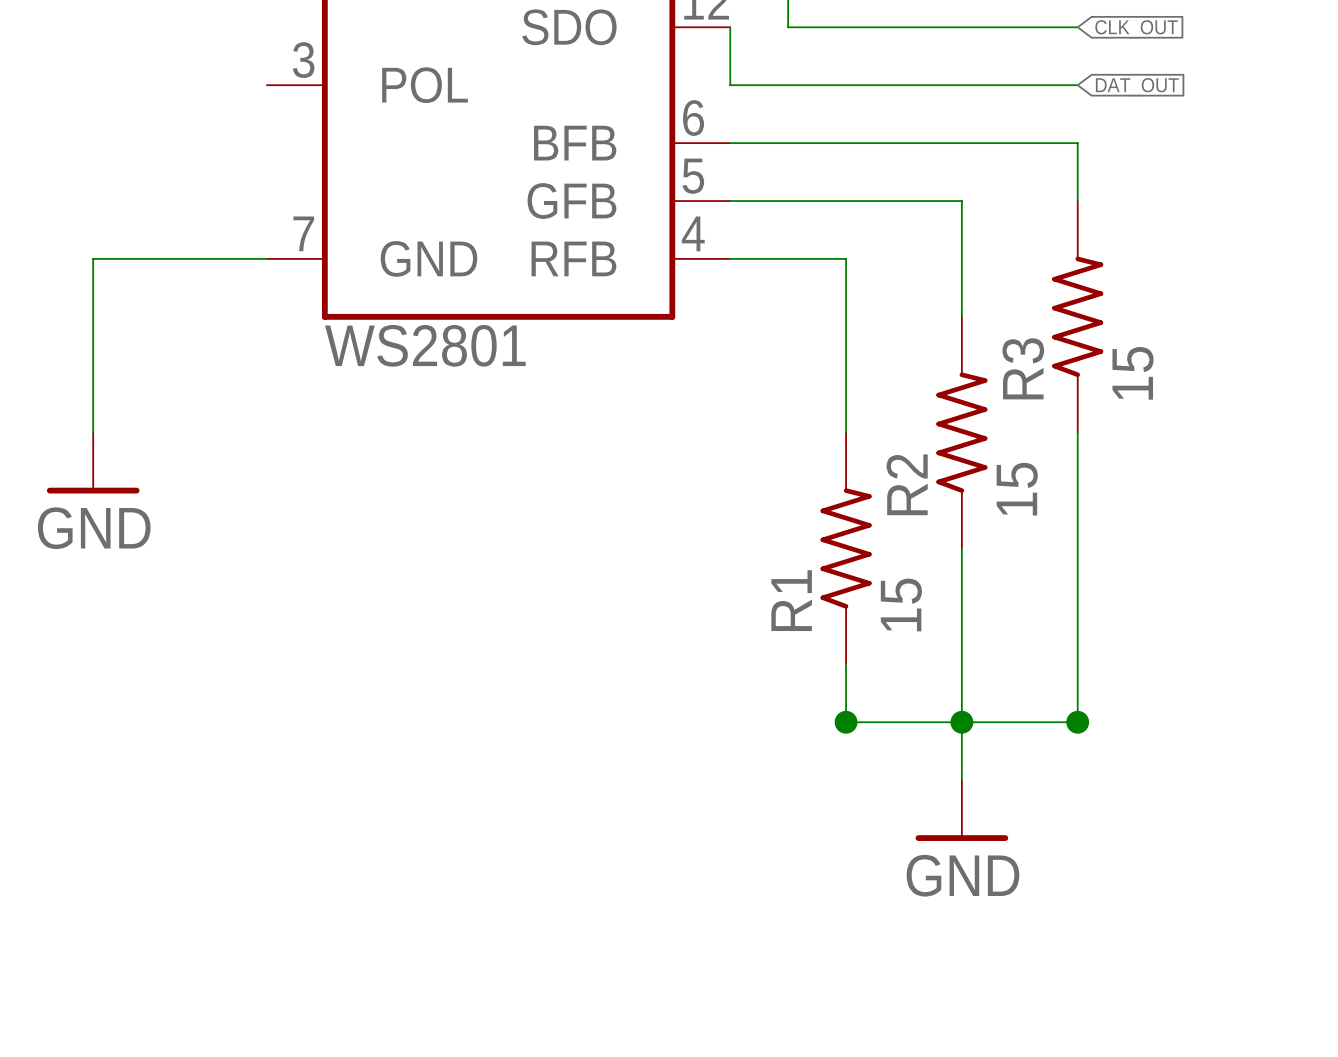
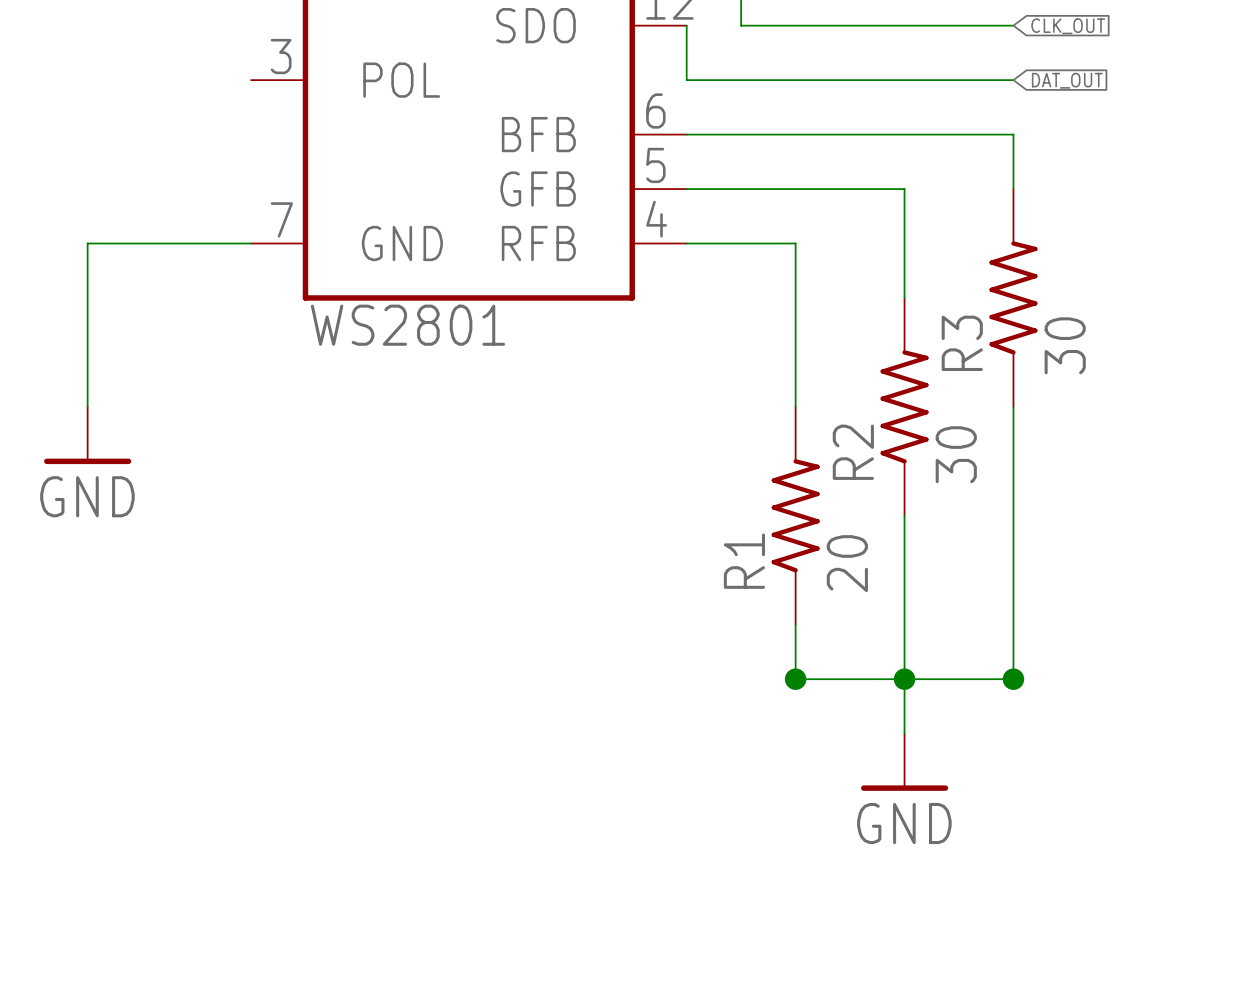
R3 value: 15 (1133, 373) -> 30 (1065, 345)
R2 value: 15 (1017, 489) -> 30 (956, 454)
R1 value: 15 (901, 604) -> 20 (847, 563)

